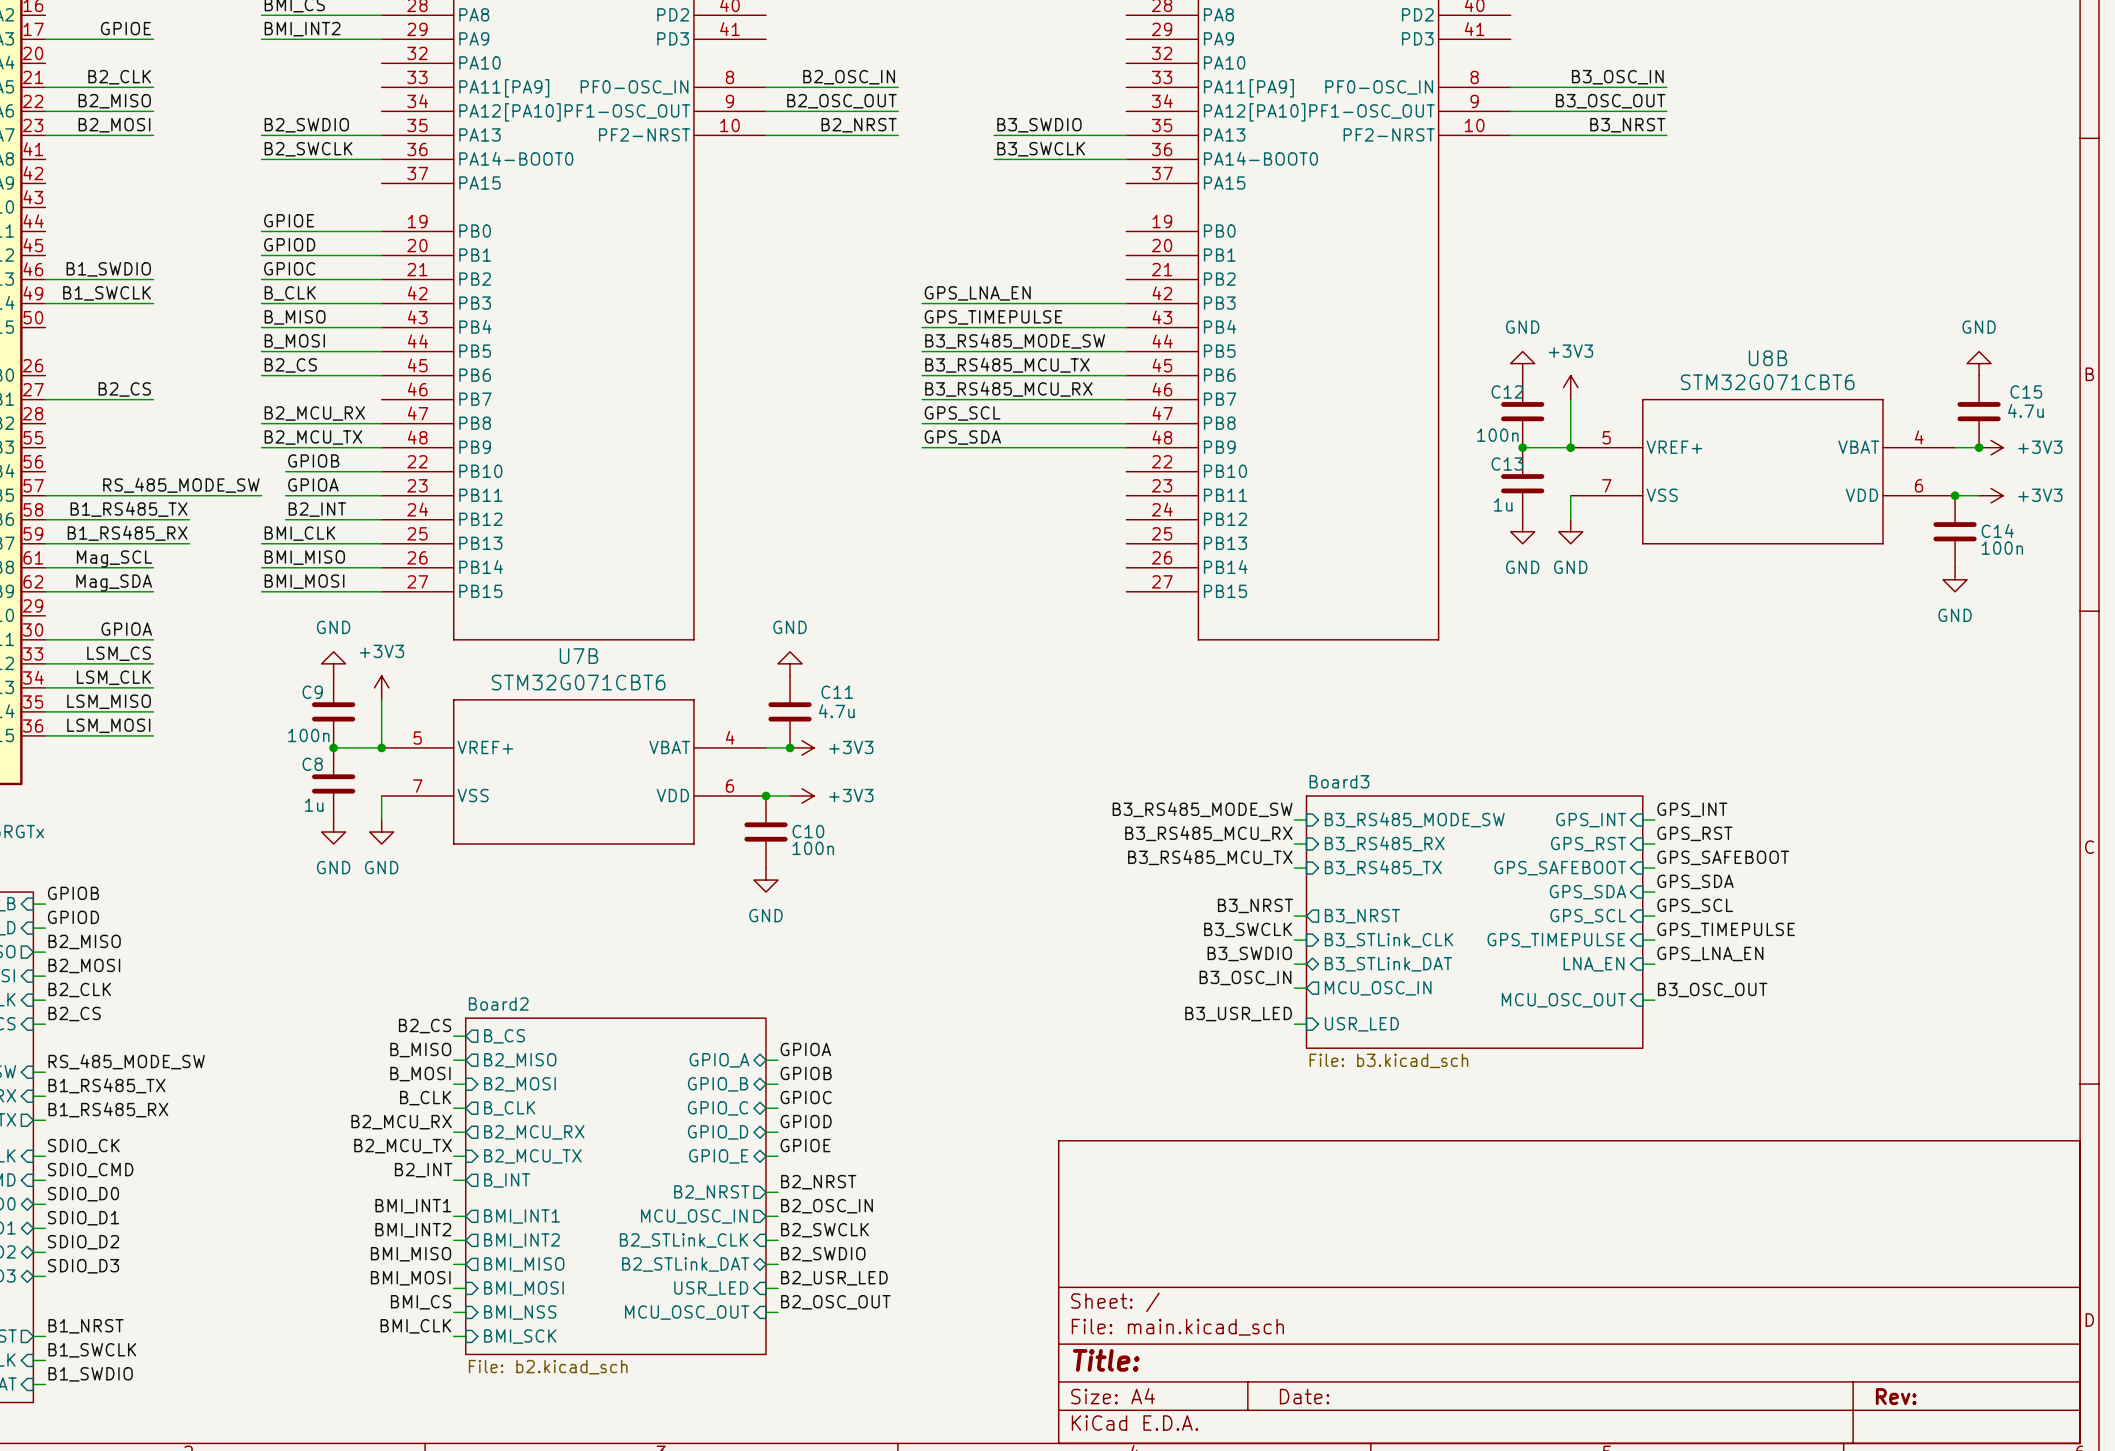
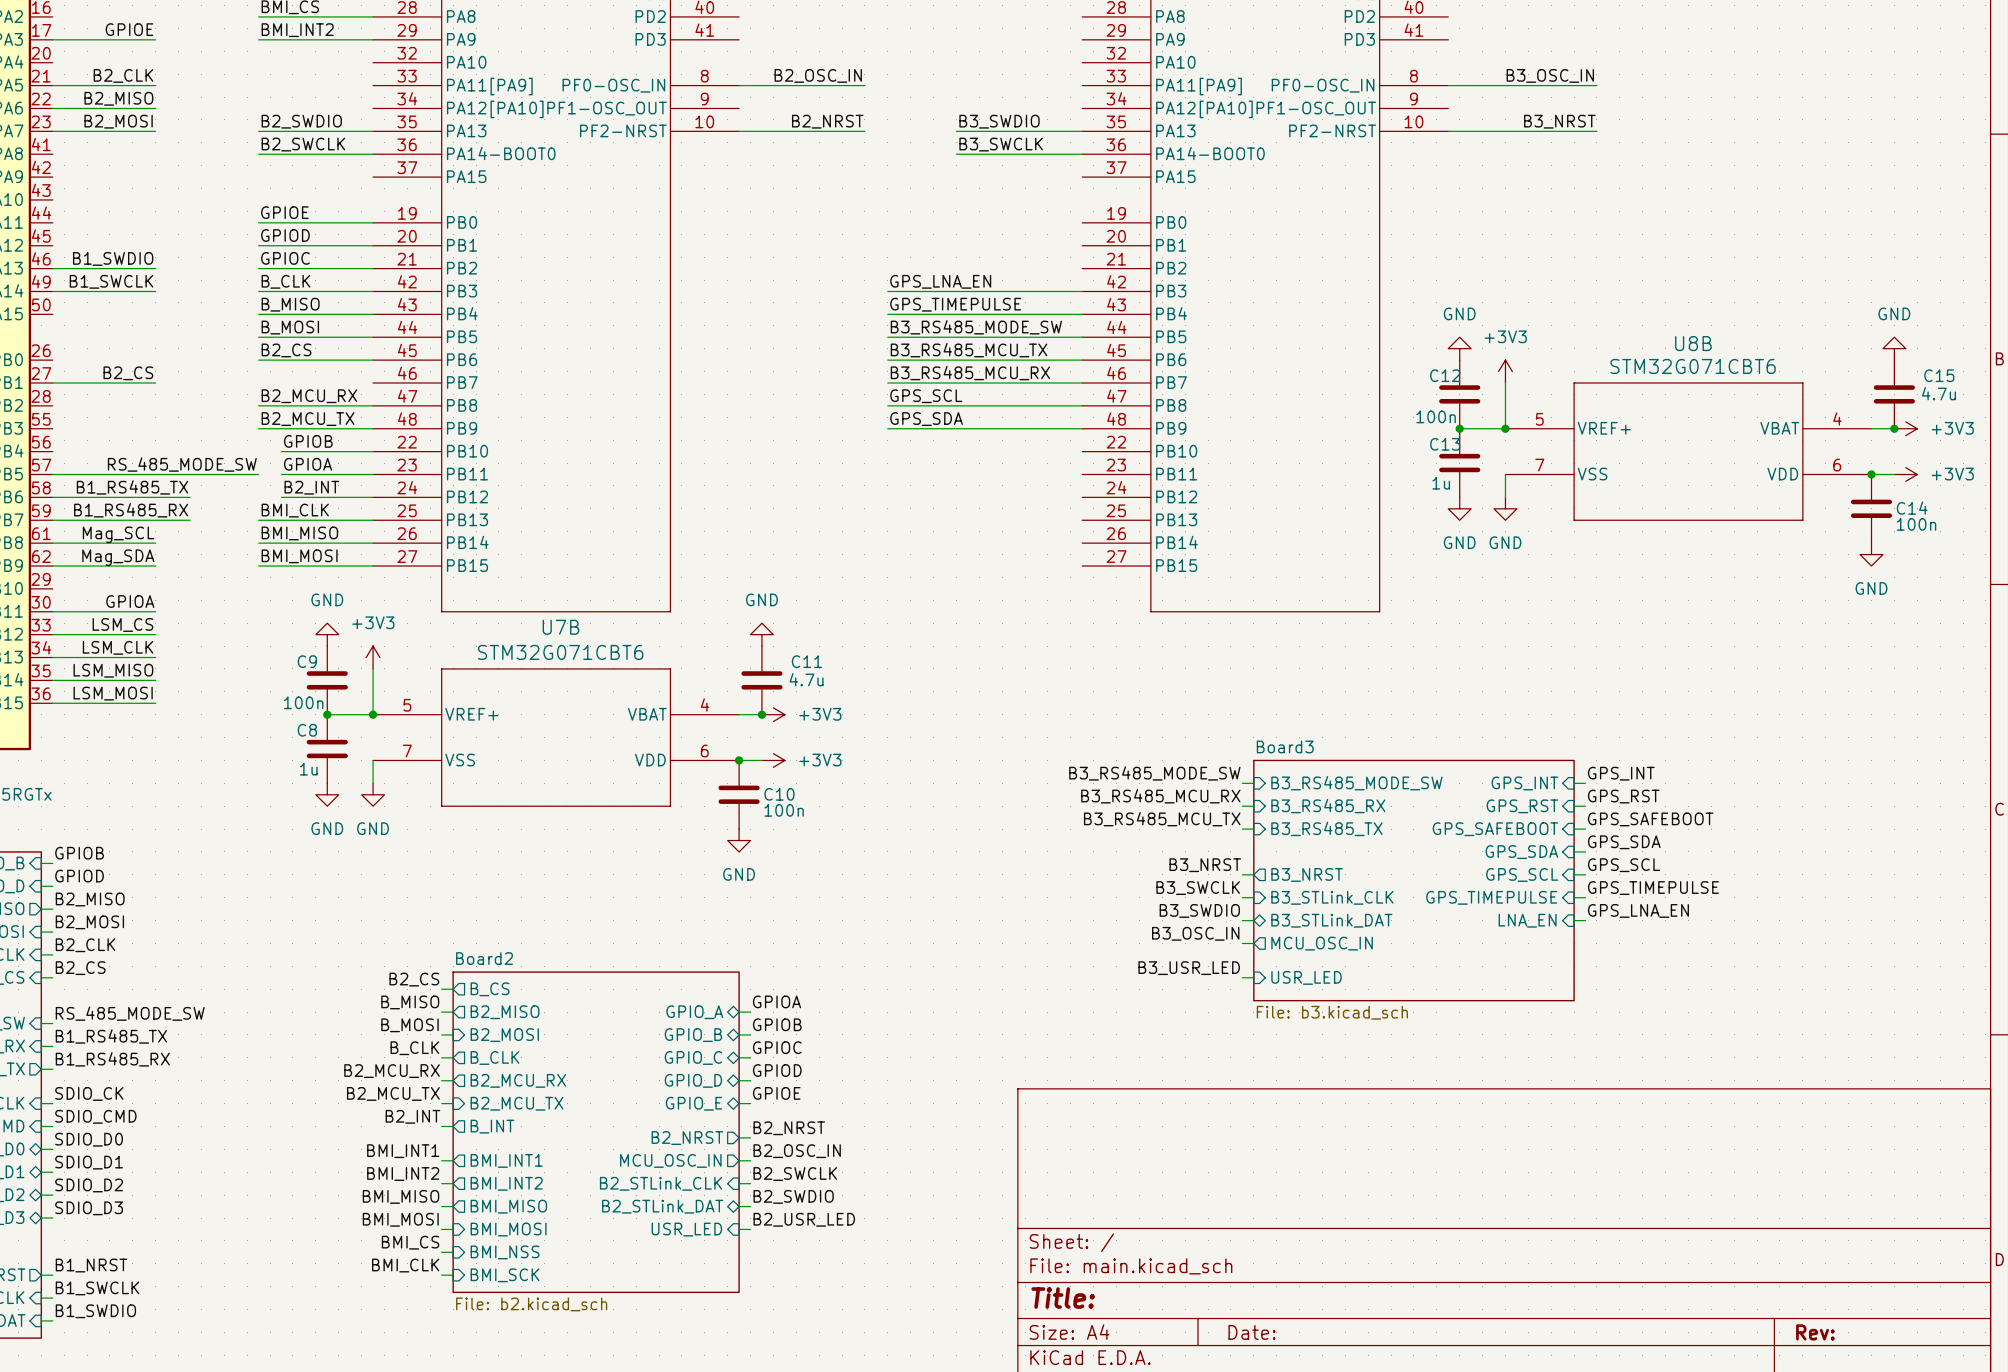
label: B2_OSC_OUT (841, 101) -> none
label: B3_OSC_OUT (1610, 101) -> none
wire: (766, 111) (898, 111) -> none
wire: (1510, 111) (1666, 111) -> none
label: B3_OSC_OUT (1712, 990) -> none
sheet pin: MCU_OSC_OUT (1563, 1000) -> none
wire: (1642, 1000) (1654, 1000) -> none
label: B2_OSC_OUT (835, 1302) -> none
sheet pin: MCU_OSC_OUT (687, 1312) -> none
wire: (766, 1312) (778, 1312) -> none

